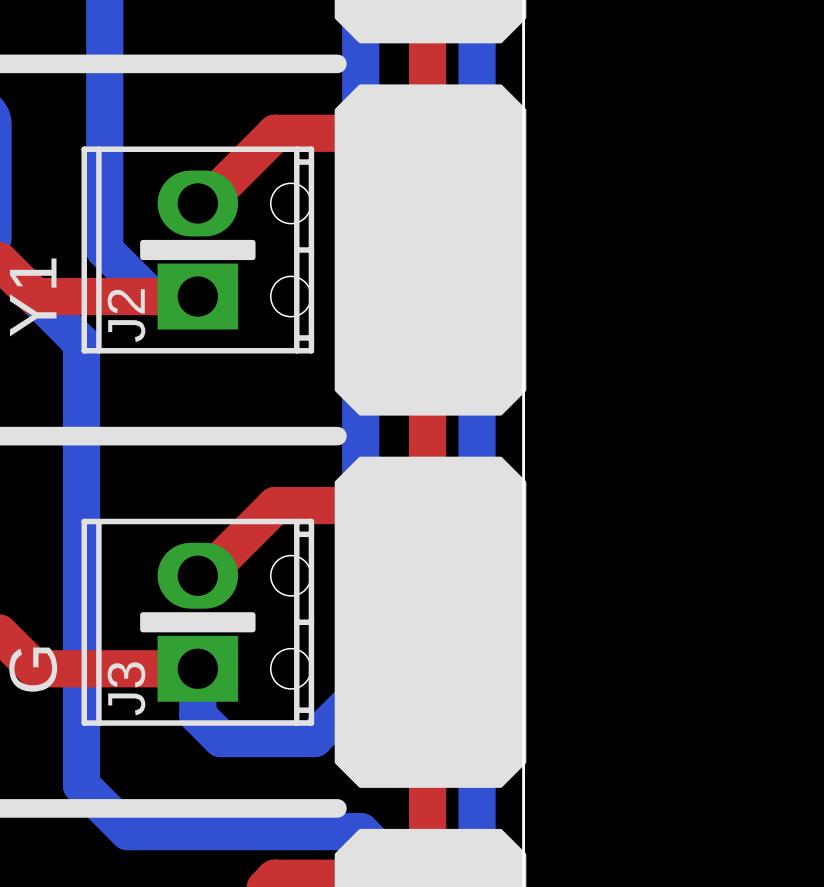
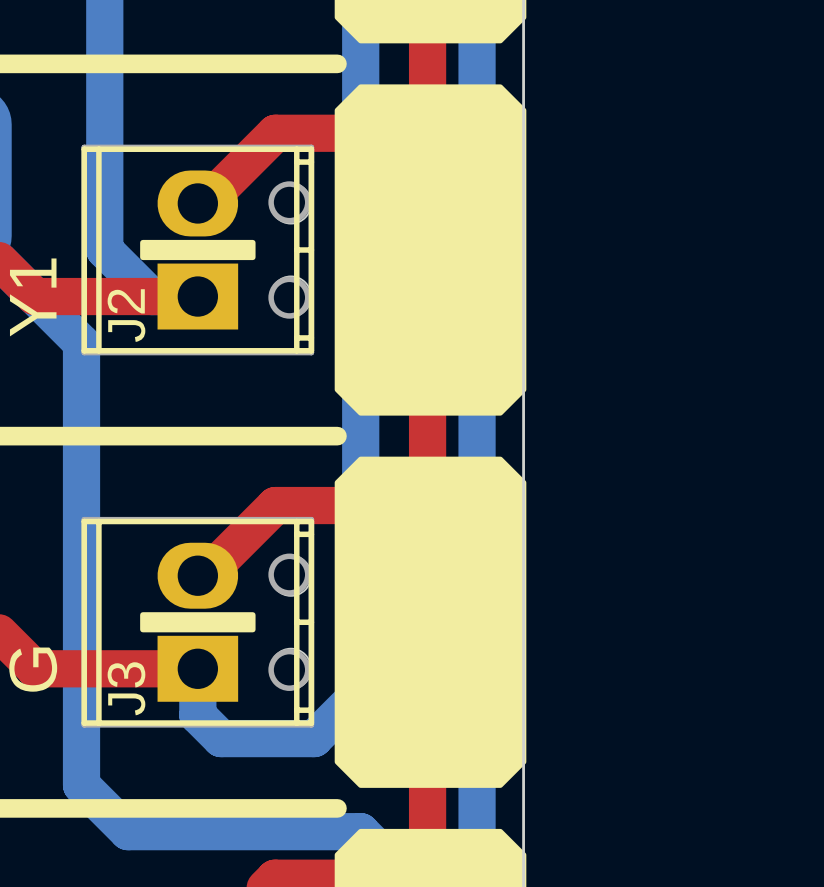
J2 footprint: [81, 146, 315, 354] -> [81, 144, 315, 356]
J3 footprint: [81, 518, 315, 726] -> [81, 516, 315, 728]

